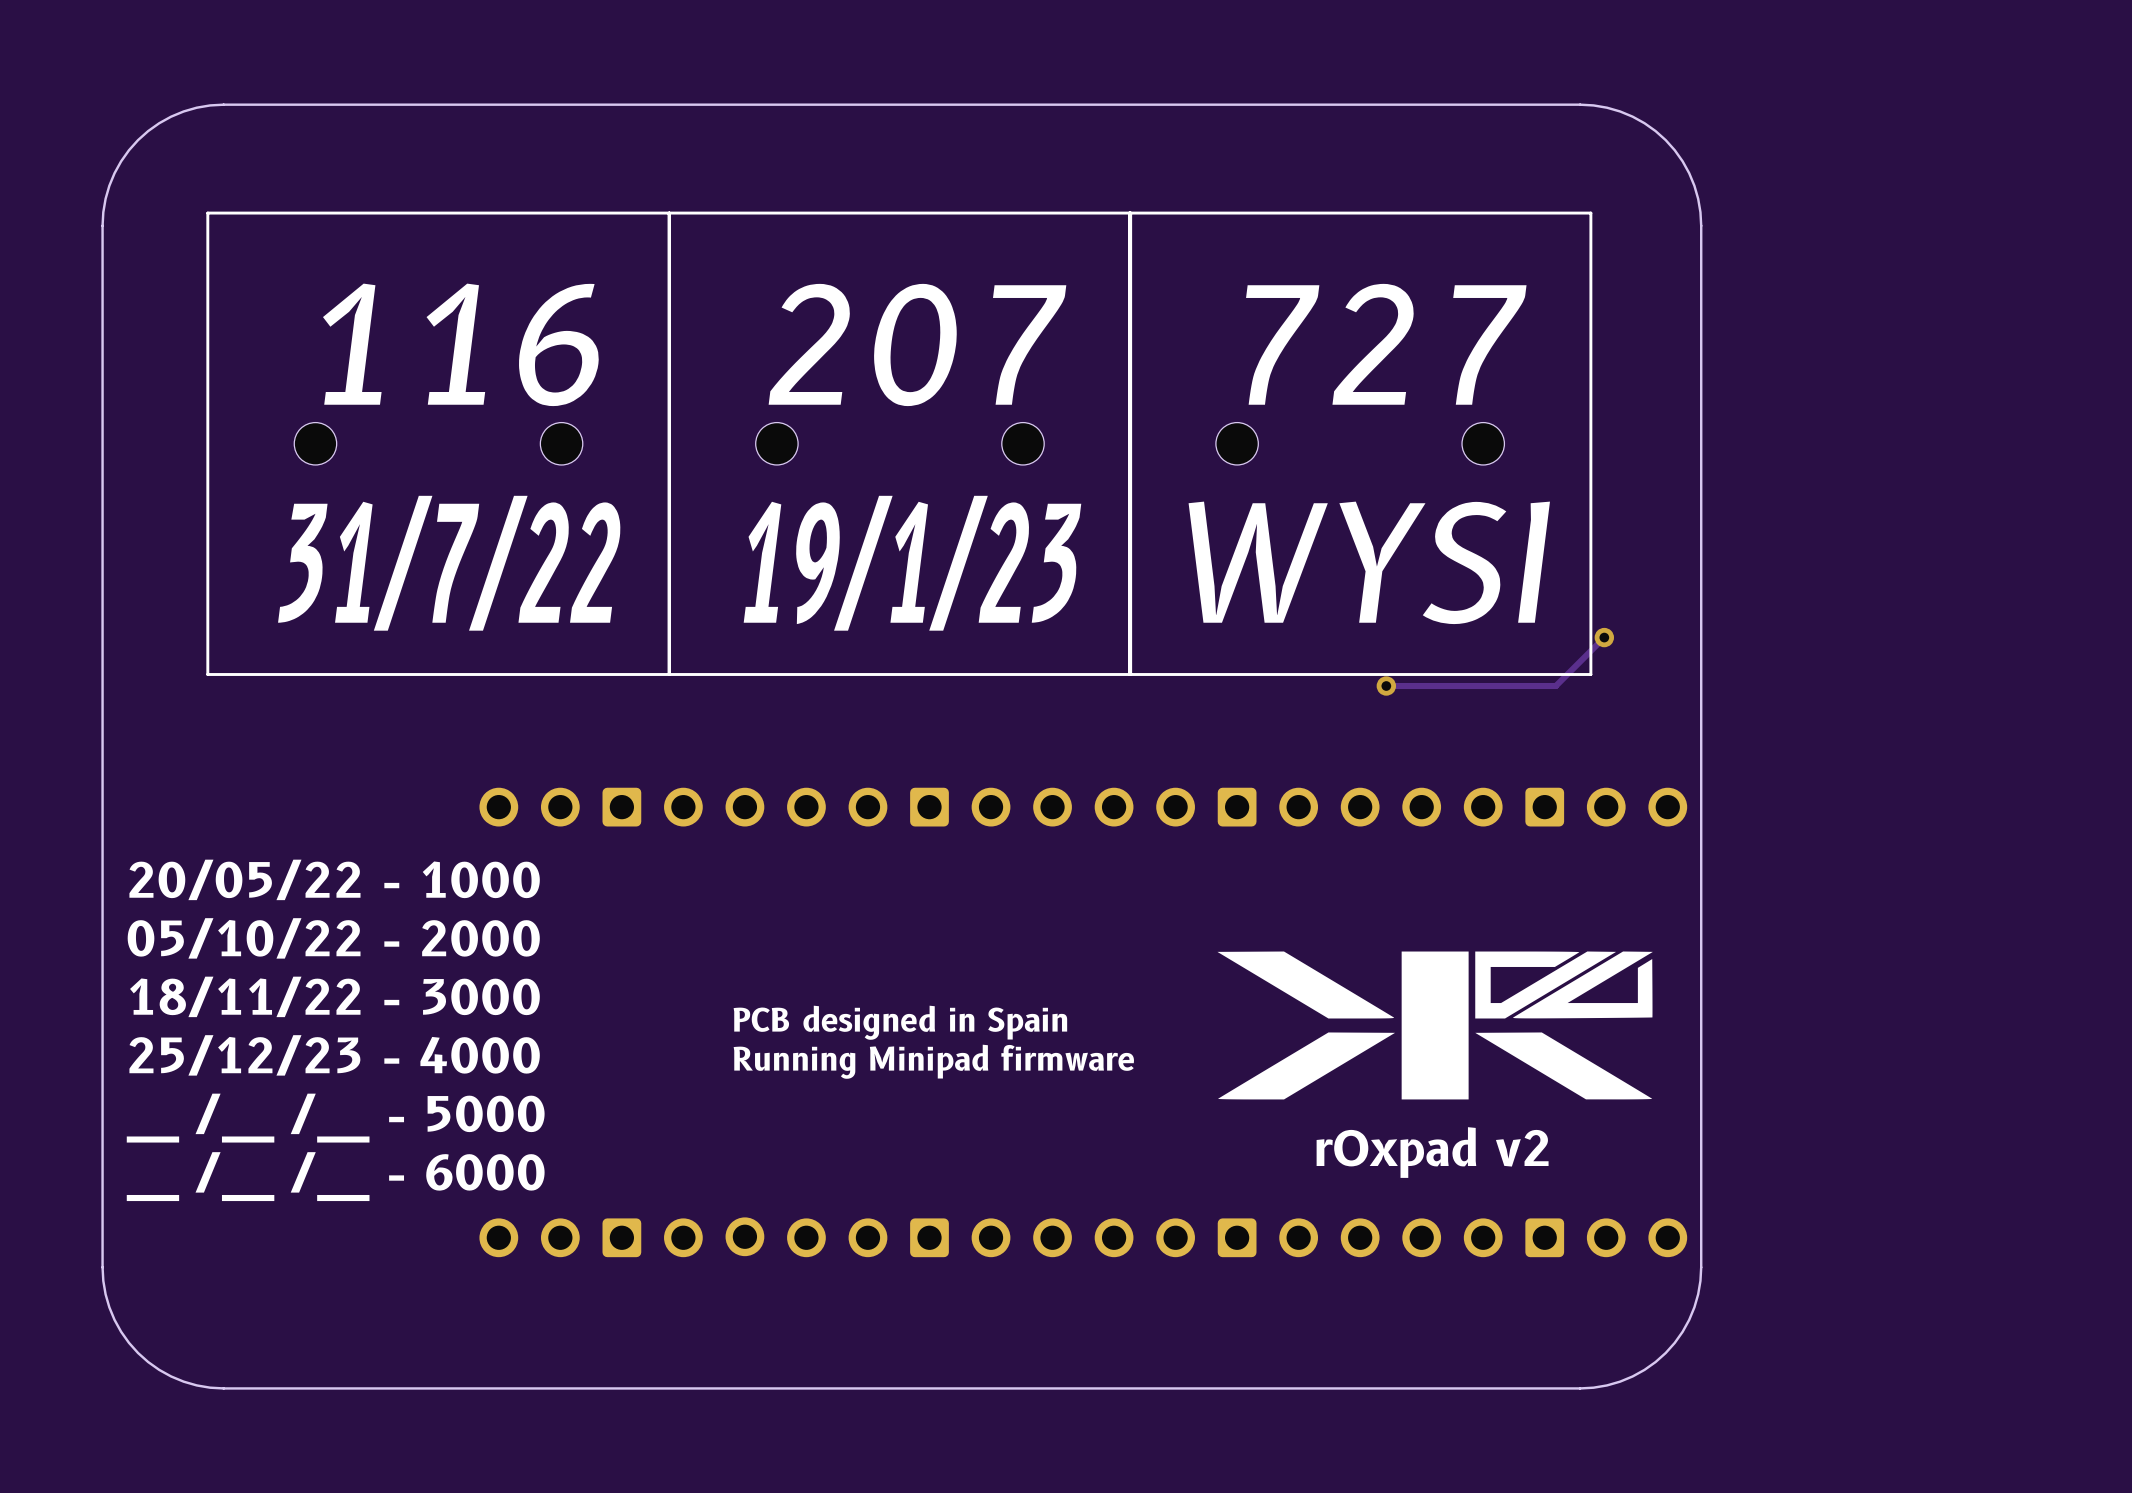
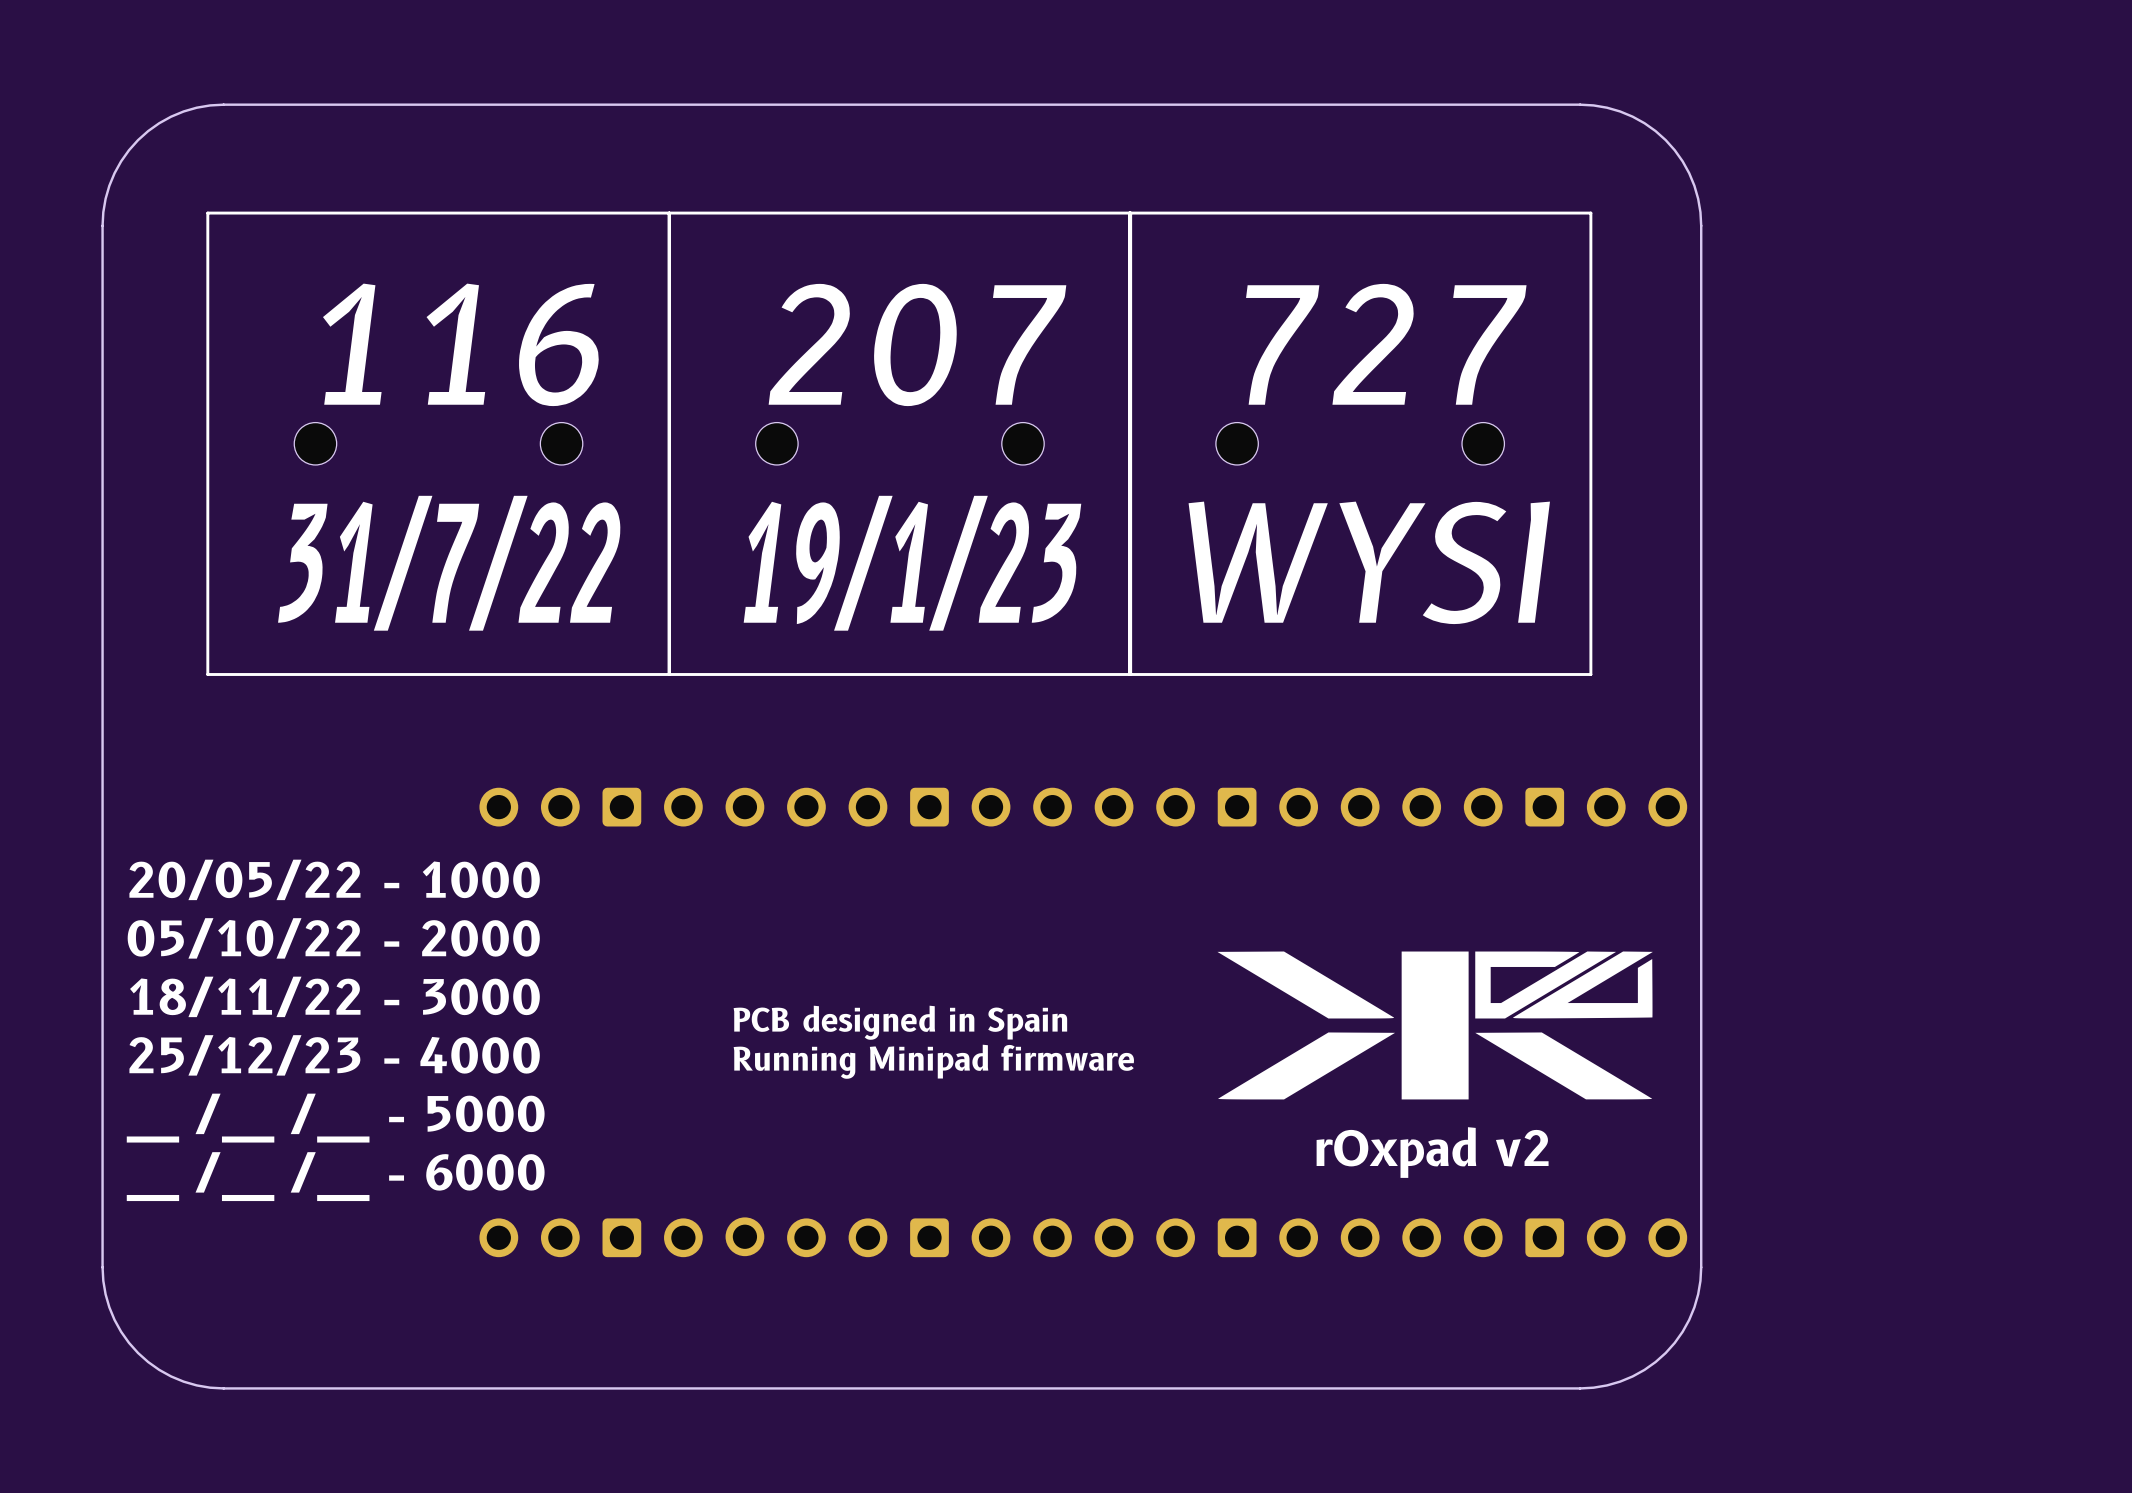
track: (1604, 637) (1555, 686) (1386, 686) -> none
via: (1604, 637) -> none
via: (1386, 686) -> none

